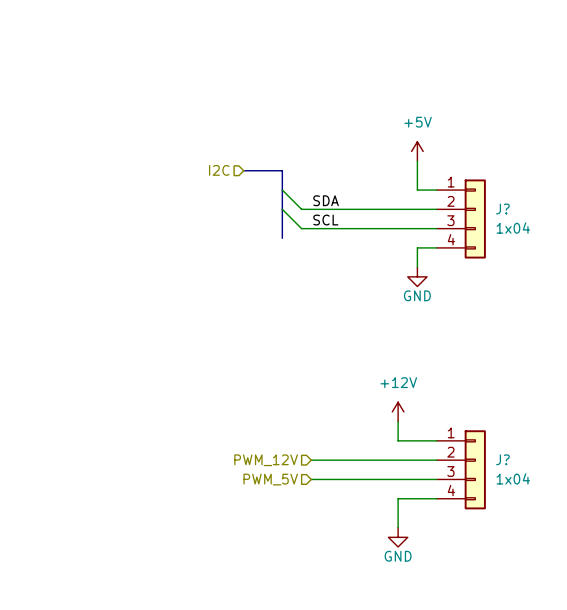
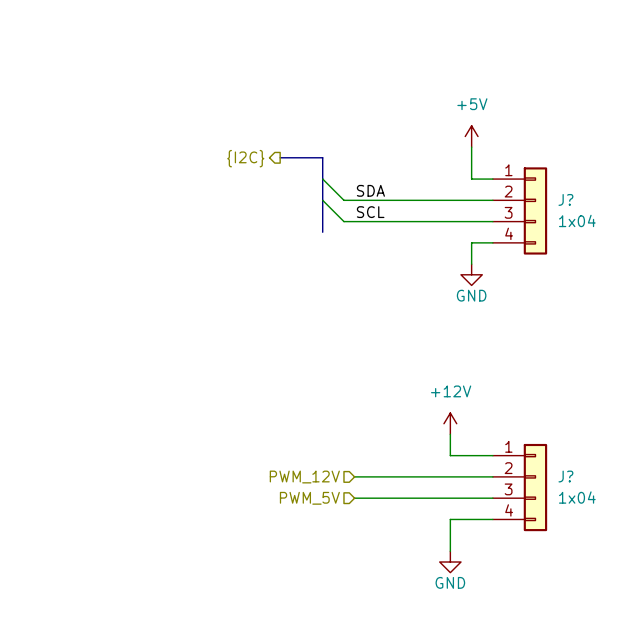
hierarchical label shape: input (219, 170) -> output (245, 158)
hierarchical label: I2C (219, 170) -> {I2C} (245, 158)

